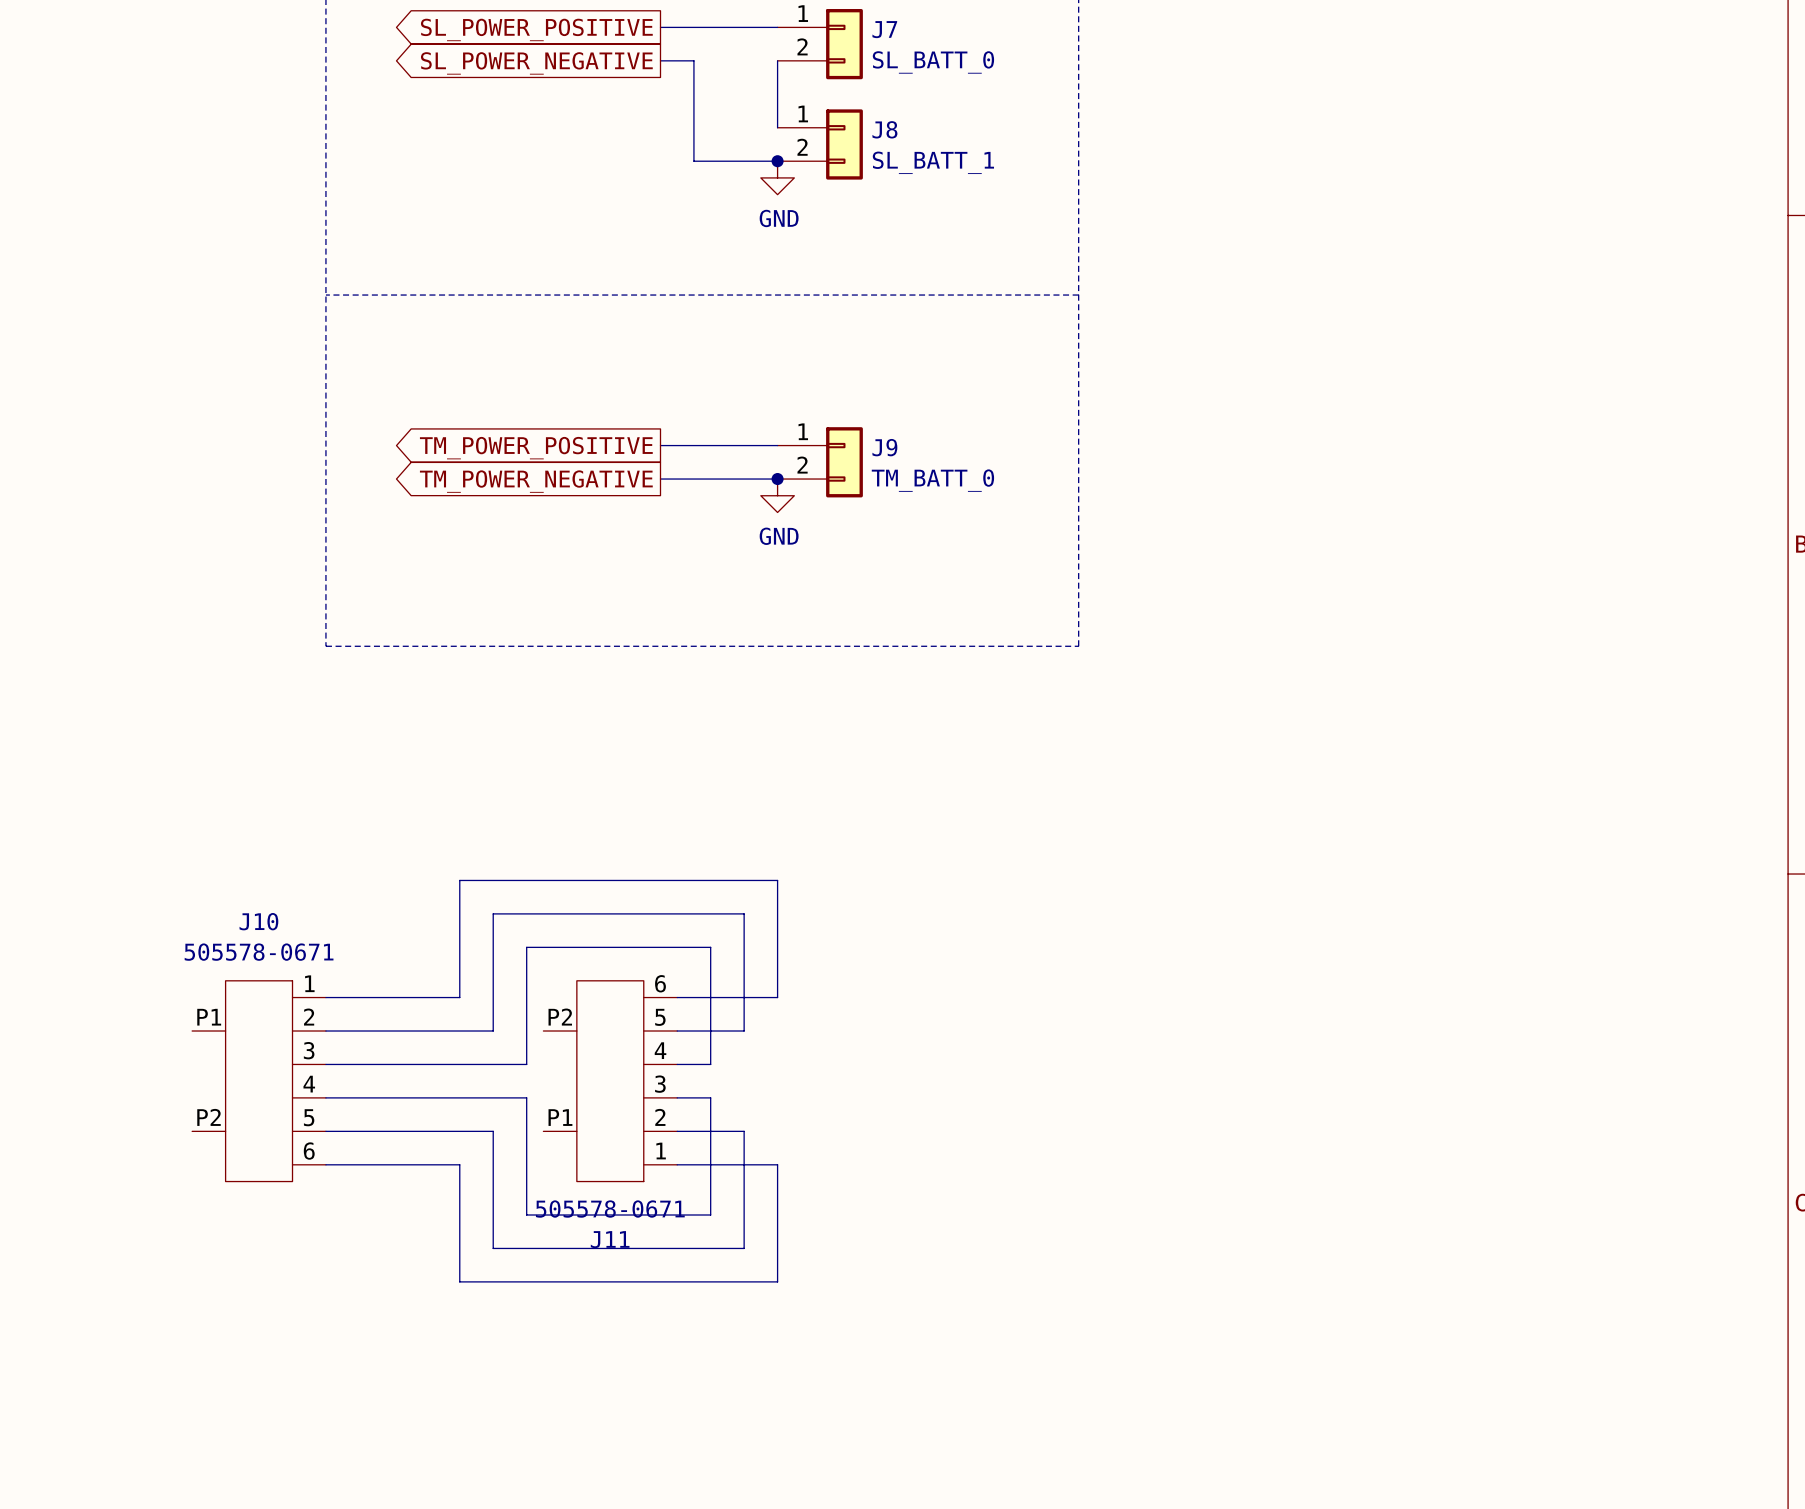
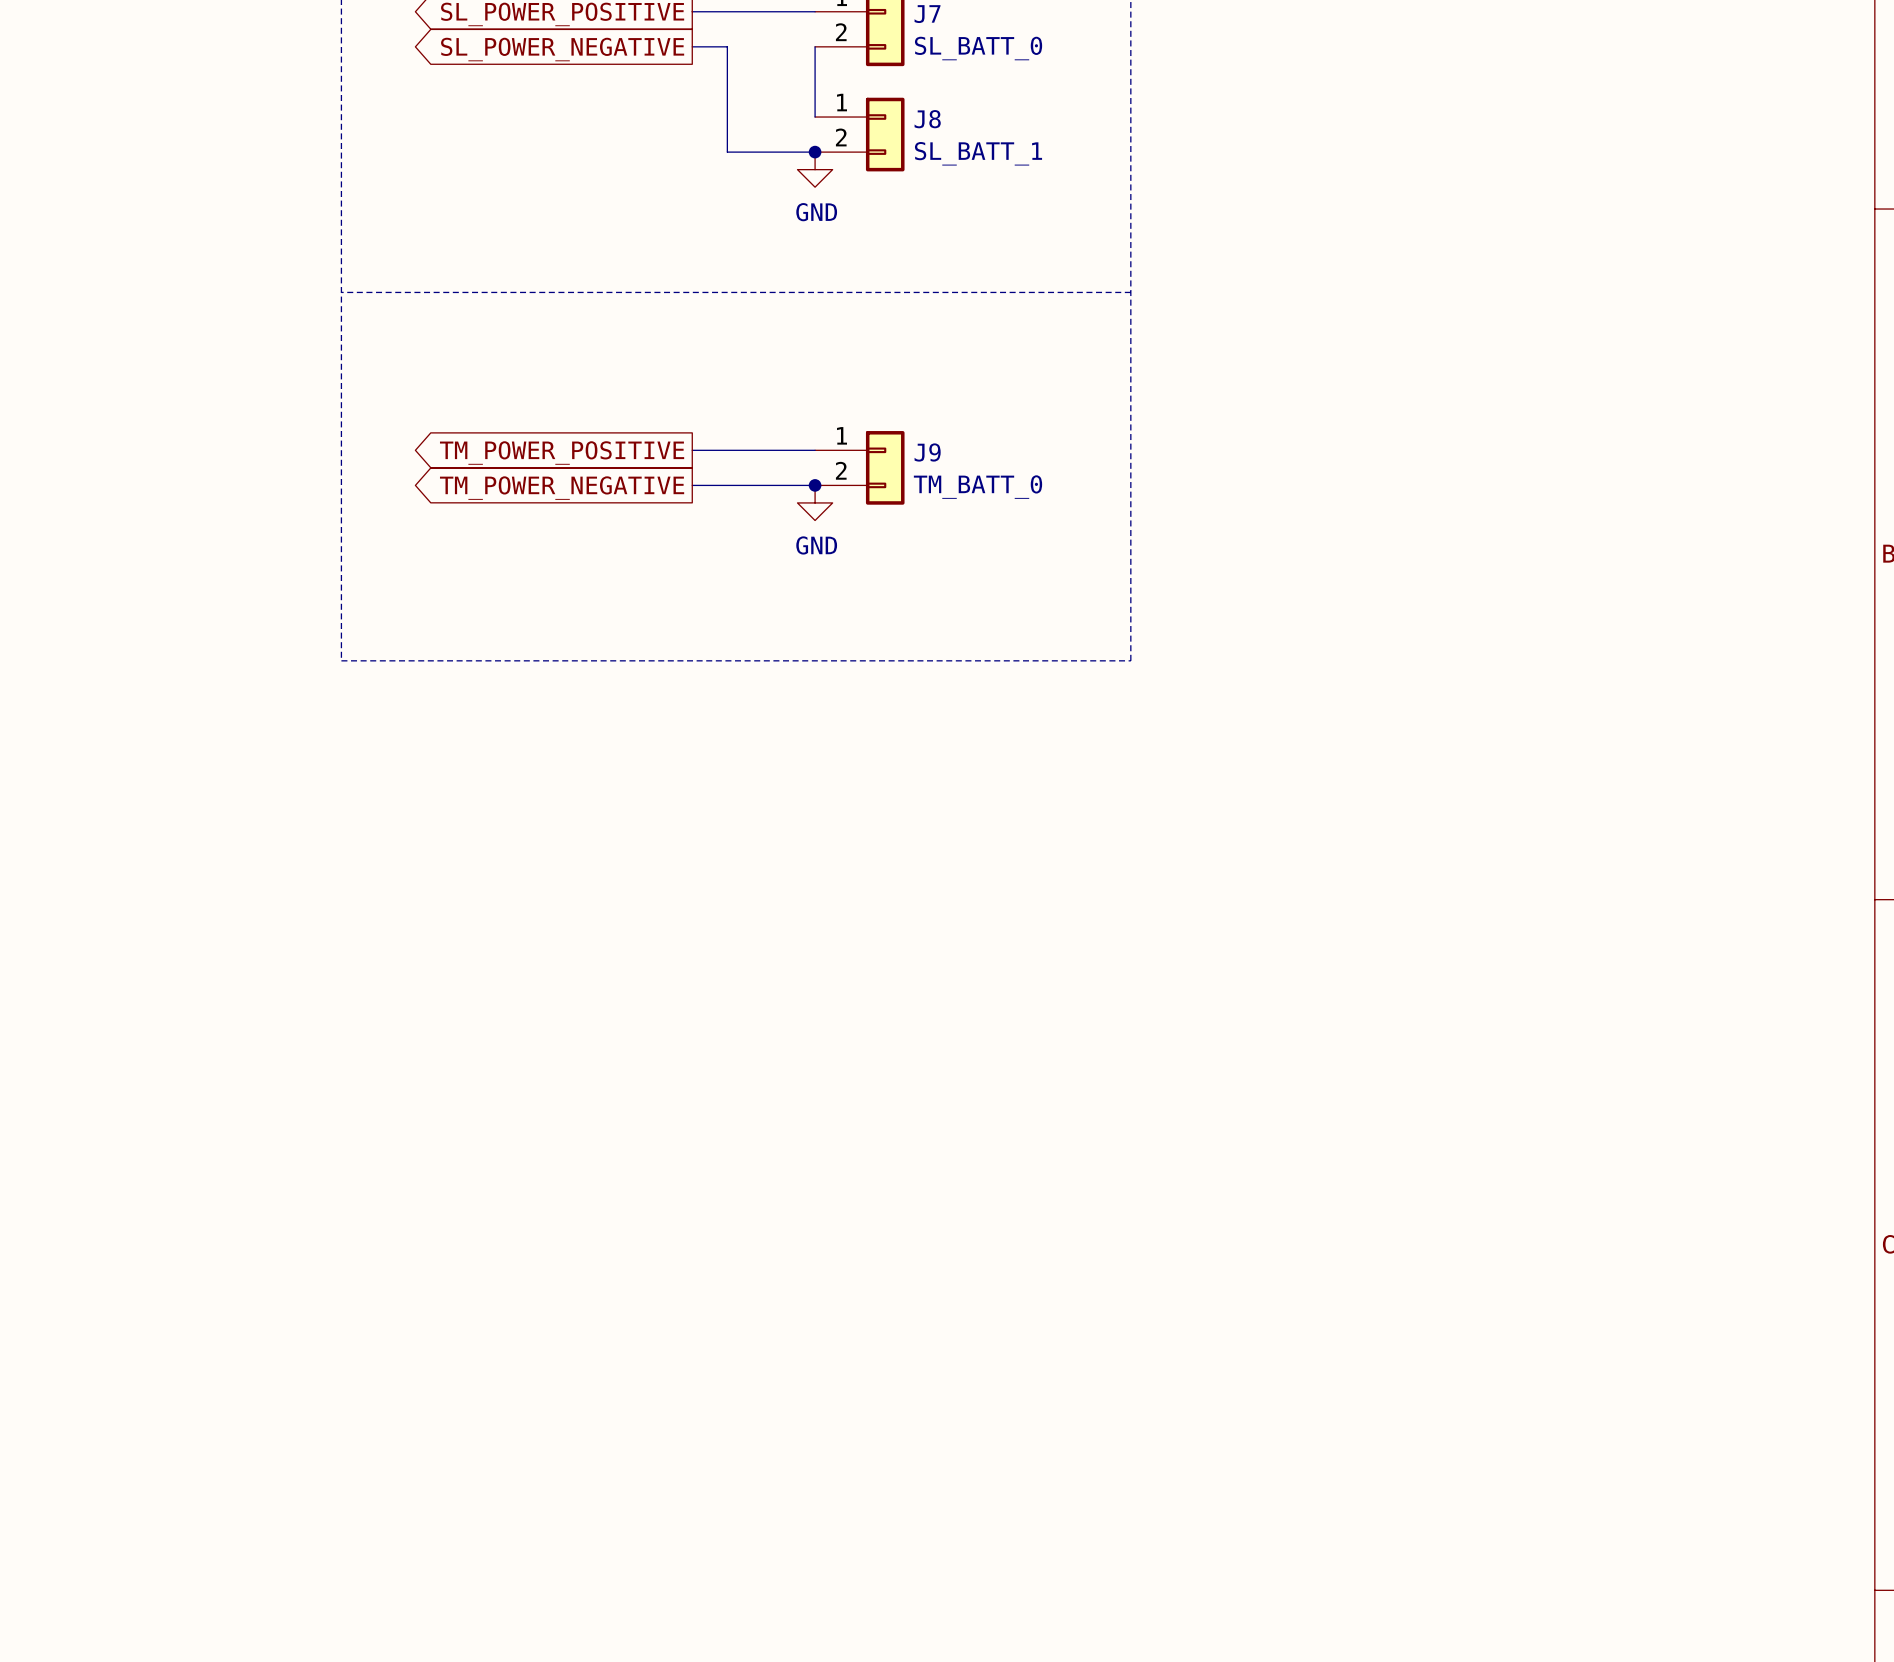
wire: (325, 997) (459, 997) (459, 880) (777, 880) (777, 997) (677, 997) -> none
wire: (325, 1031) (493, 1031) (493, 913) (744, 913) (744, 1031) (677, 1031) -> none
wire: (325, 1064) (526, 1064) (526, 947) (710, 947) (710, 1064) (677, 1064) -> none
J10: 505578-0671 (259, 1081) -> none
J11: 505578-0671 (610, 1081) -> none
wire: (325, 1097) (526, 1097) (526, 1214) (710, 1214) (710, 1097) (677, 1097) -> none
wire: (325, 1131) (493, 1131) (493, 1248) (744, 1248) (744, 1131) (677, 1131) -> none
wire: (325, 1164) (459, 1164) (459, 1281) (777, 1281) (777, 1164) (677, 1164) -> none

